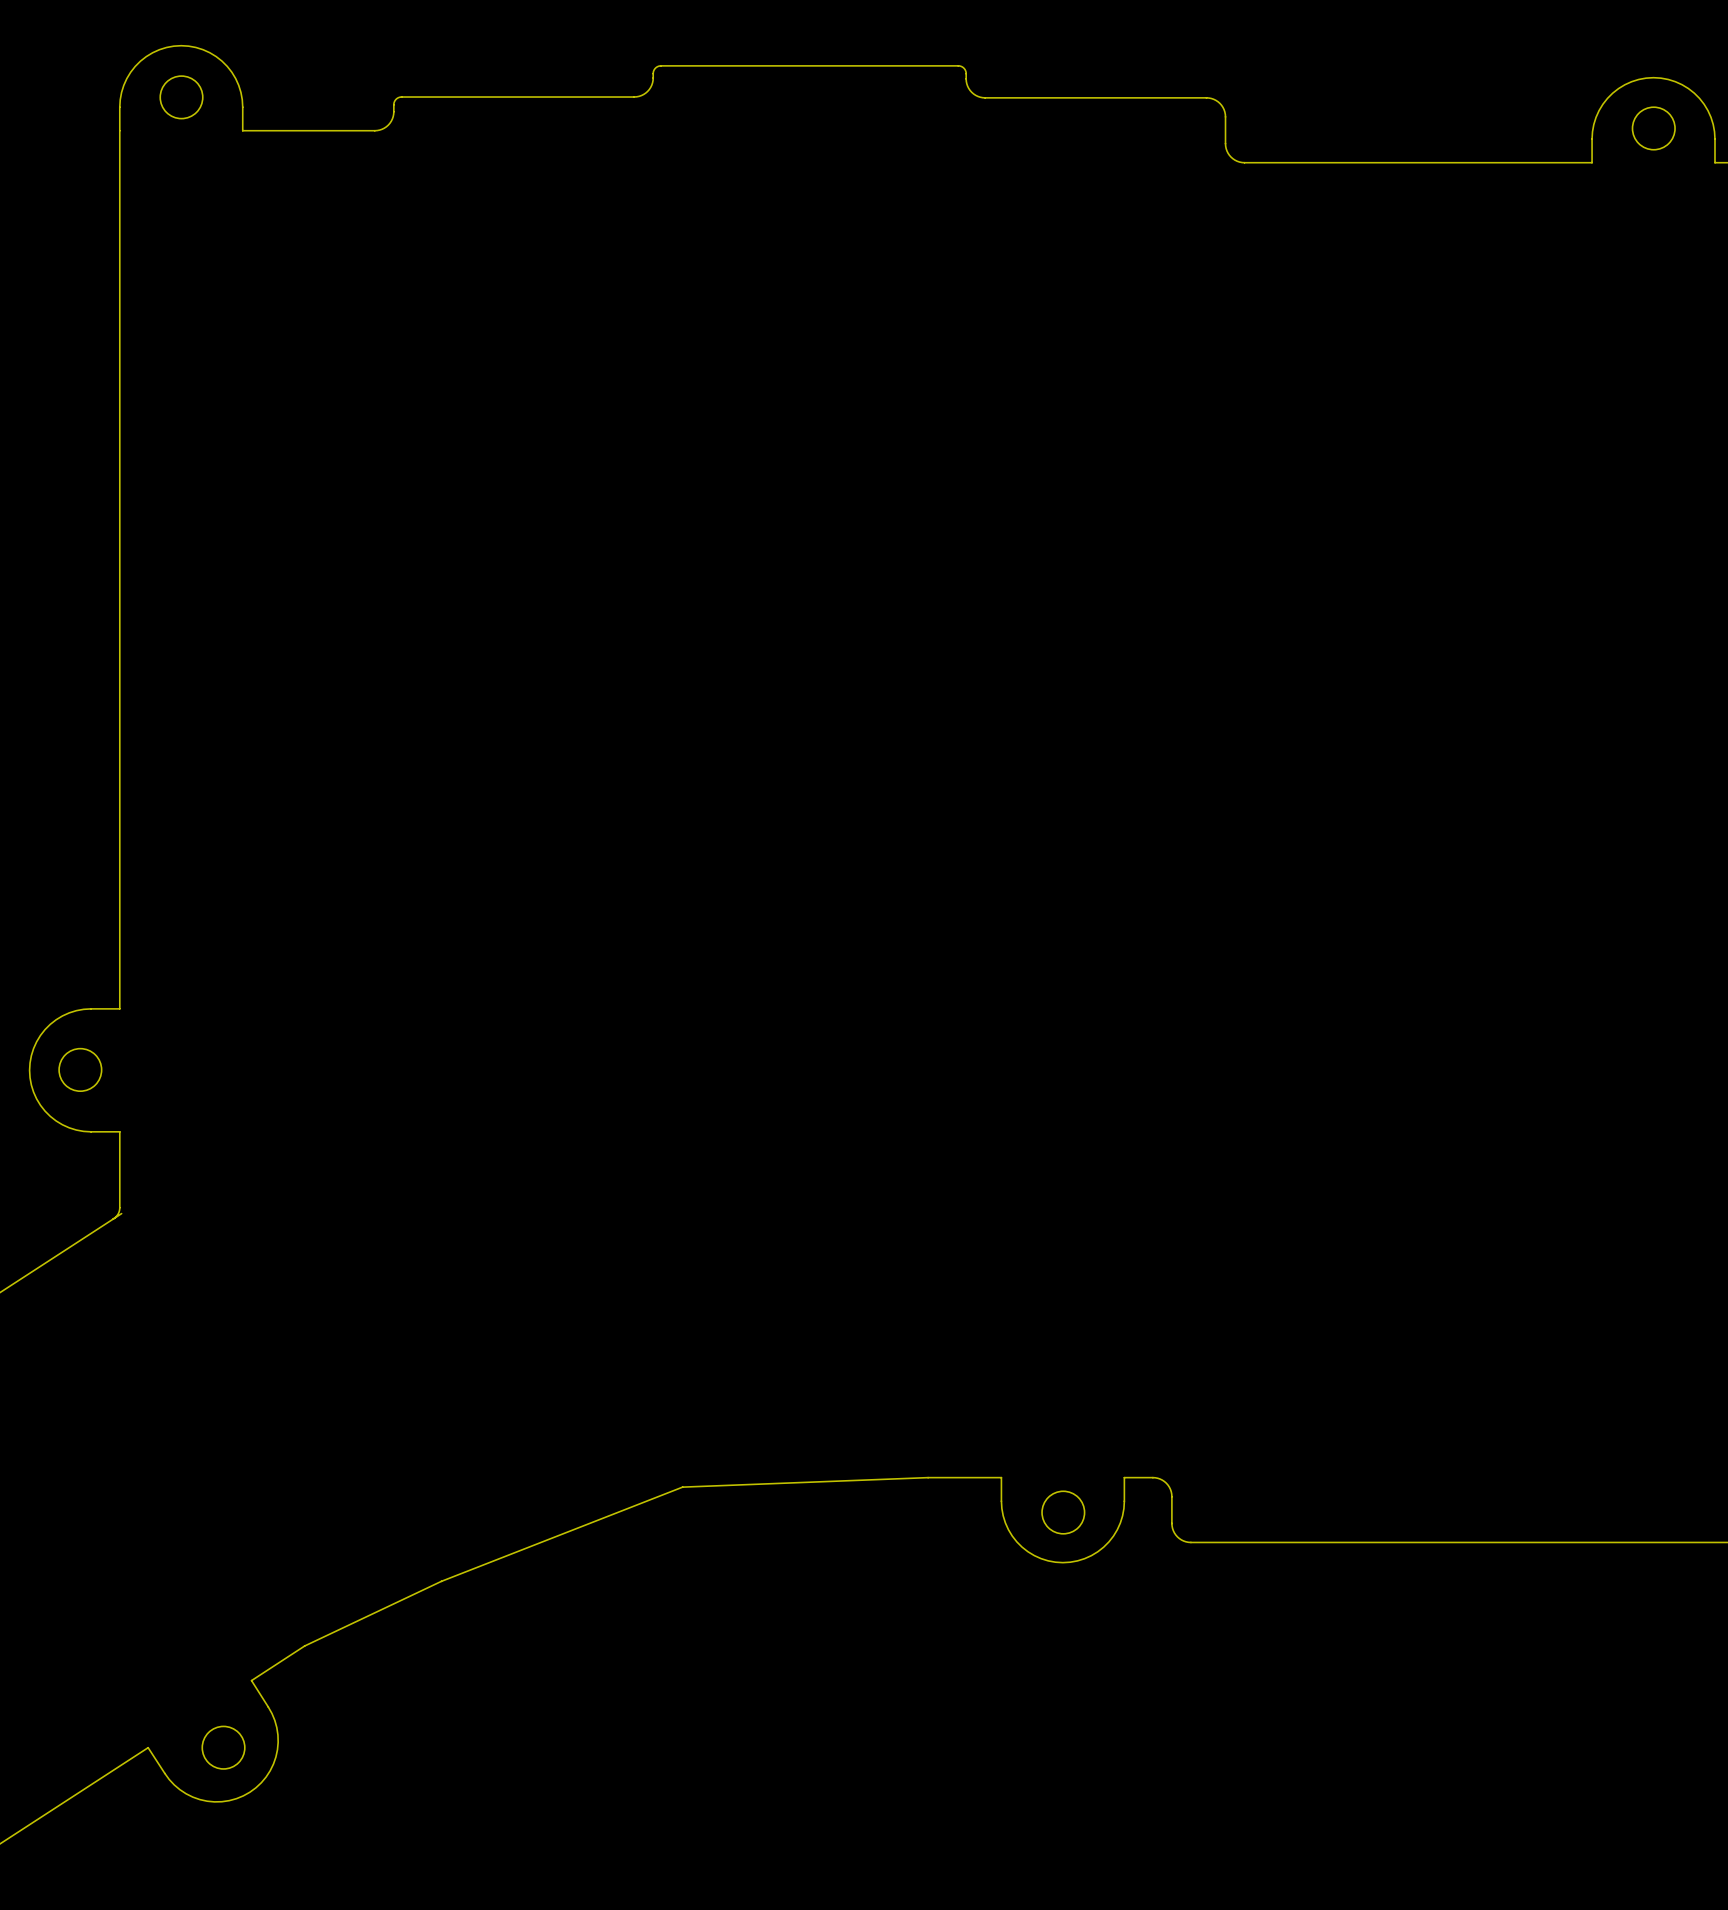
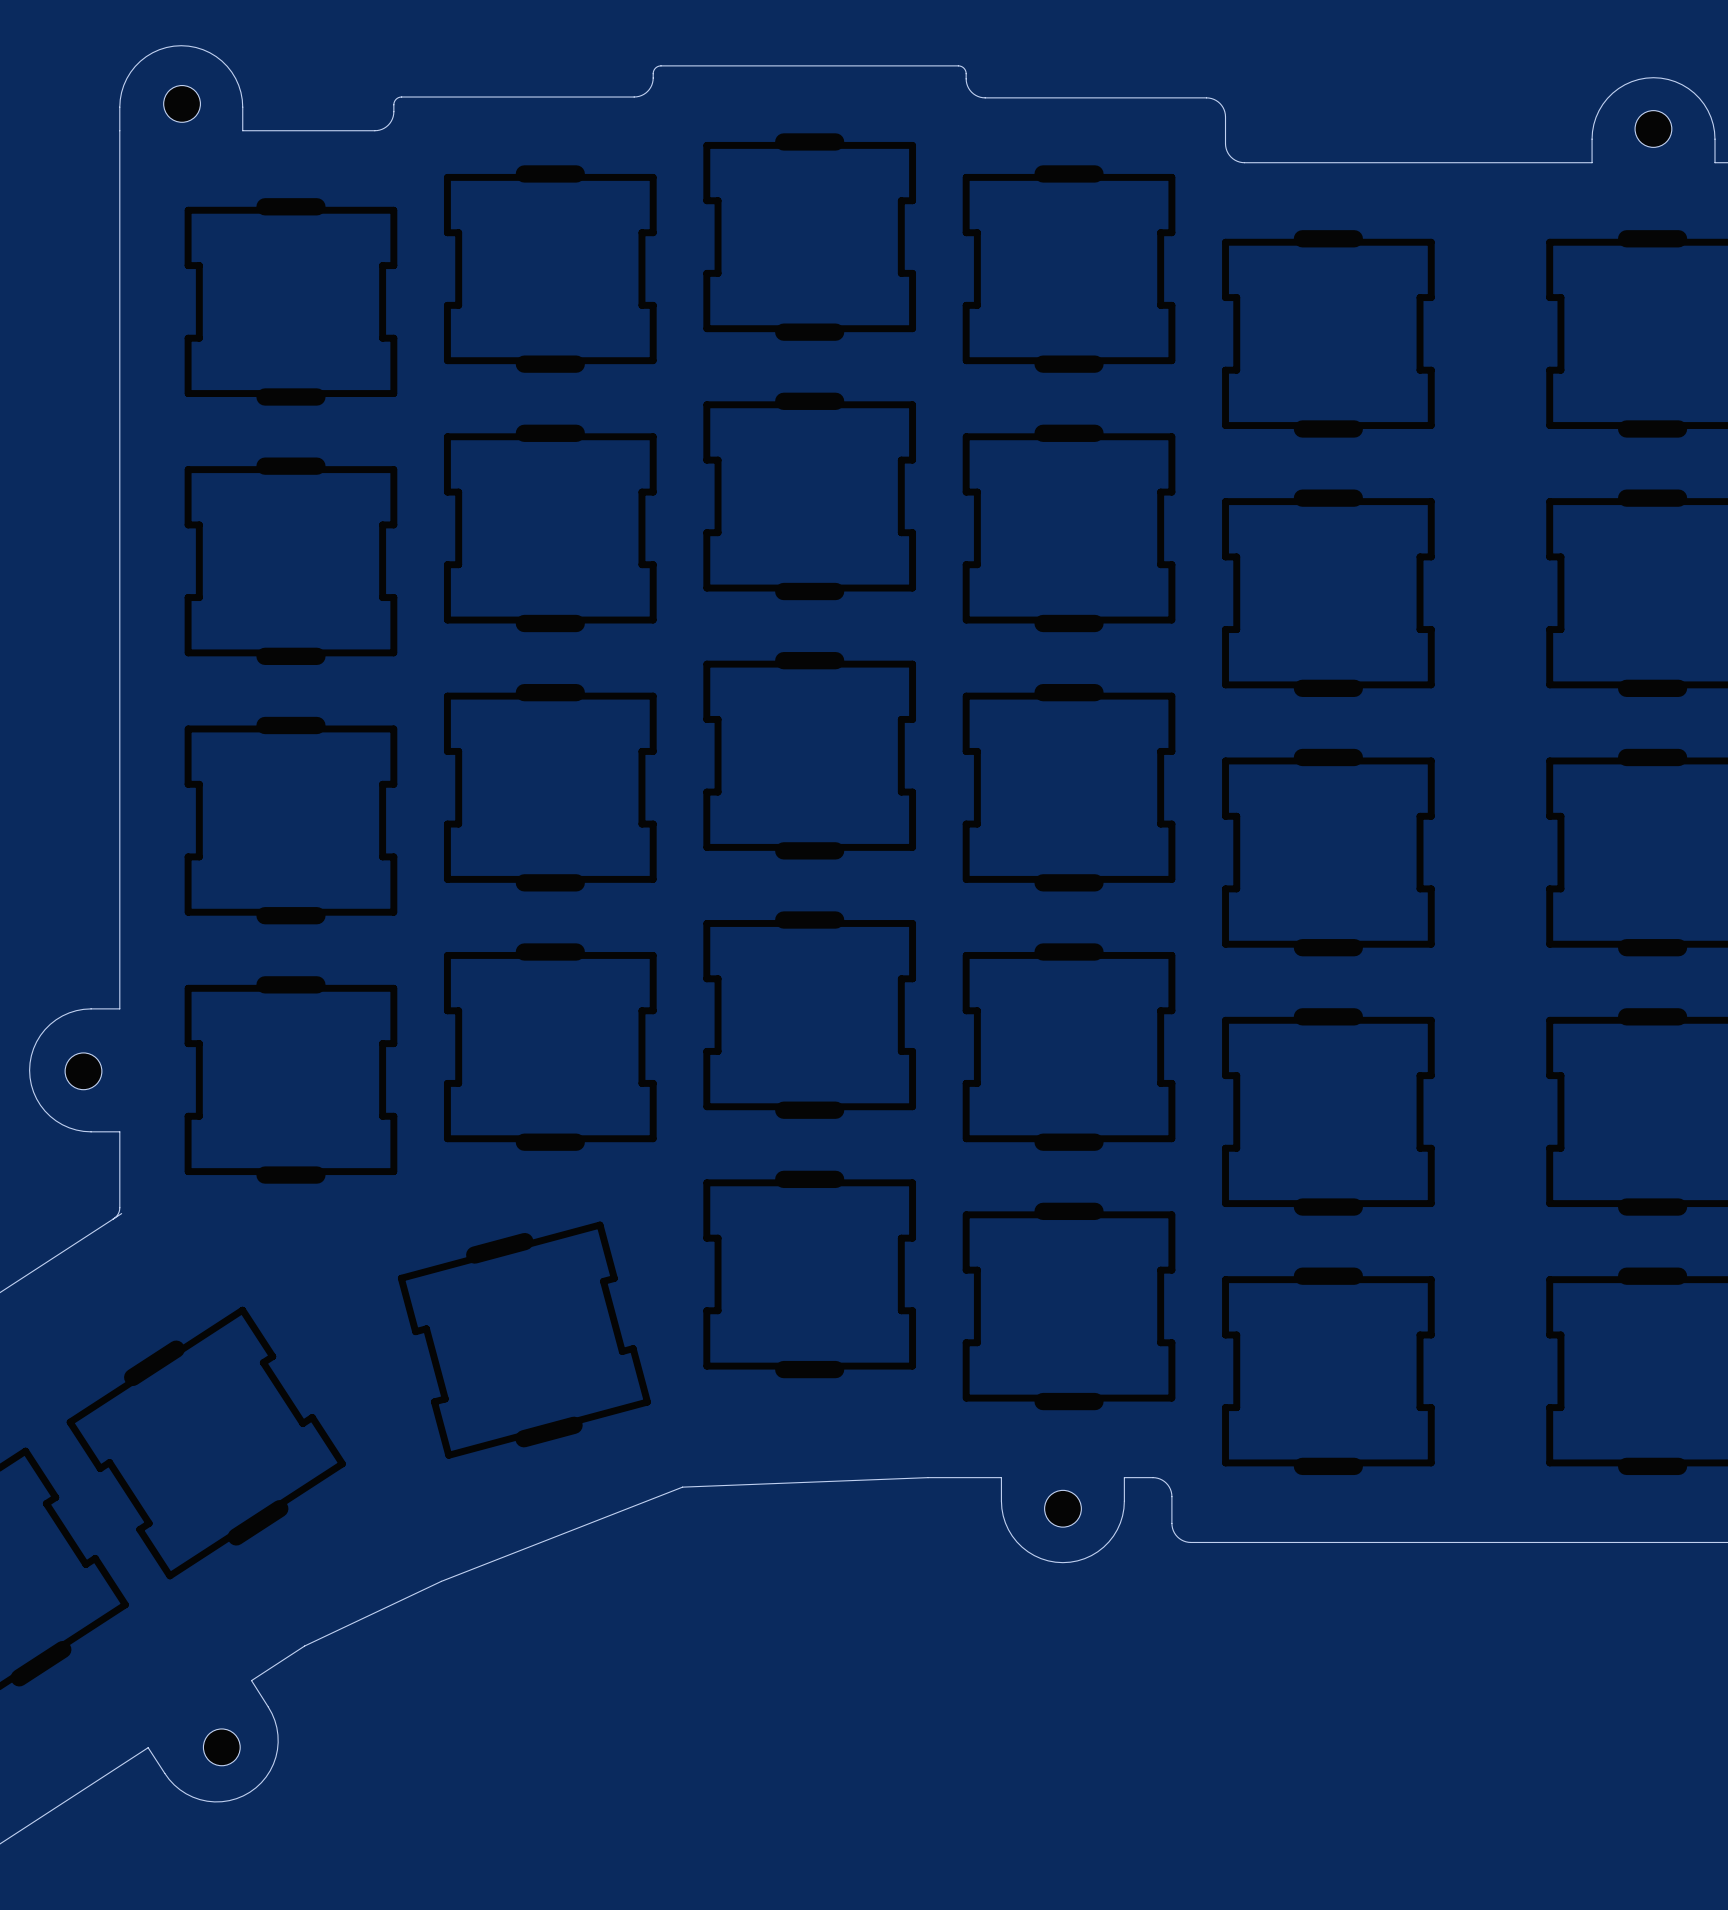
round board edge: [159, 75, 204, 119] -> none
part: none -> (182, 103)
round board edge: [1632, 106, 1676, 151] -> none
part: none -> (1653, 128)
round board edge: [58, 1048, 102, 1092] -> none
part: none -> (83, 1071)
round board edge: [1041, 1490, 1085, 1535] -> none
part: none -> (1062, 1508)
round board edge: [201, 1726, 246, 1770] -> none
part: none -> (221, 1747)

